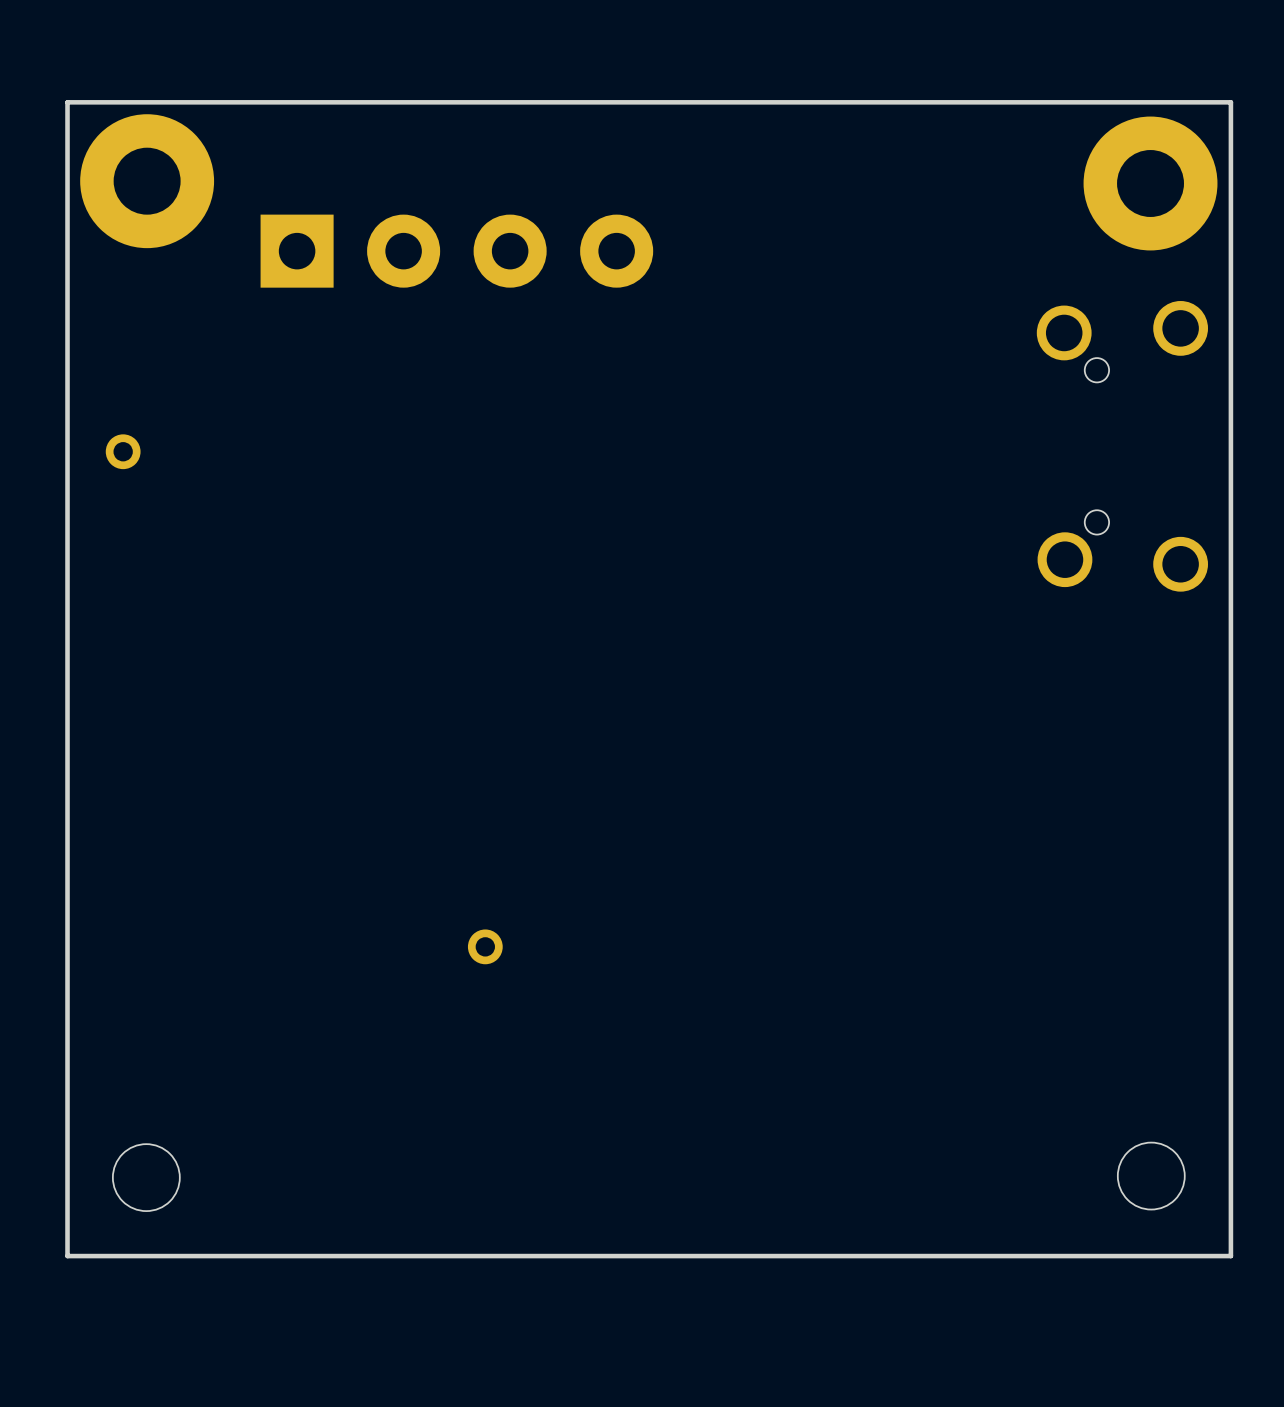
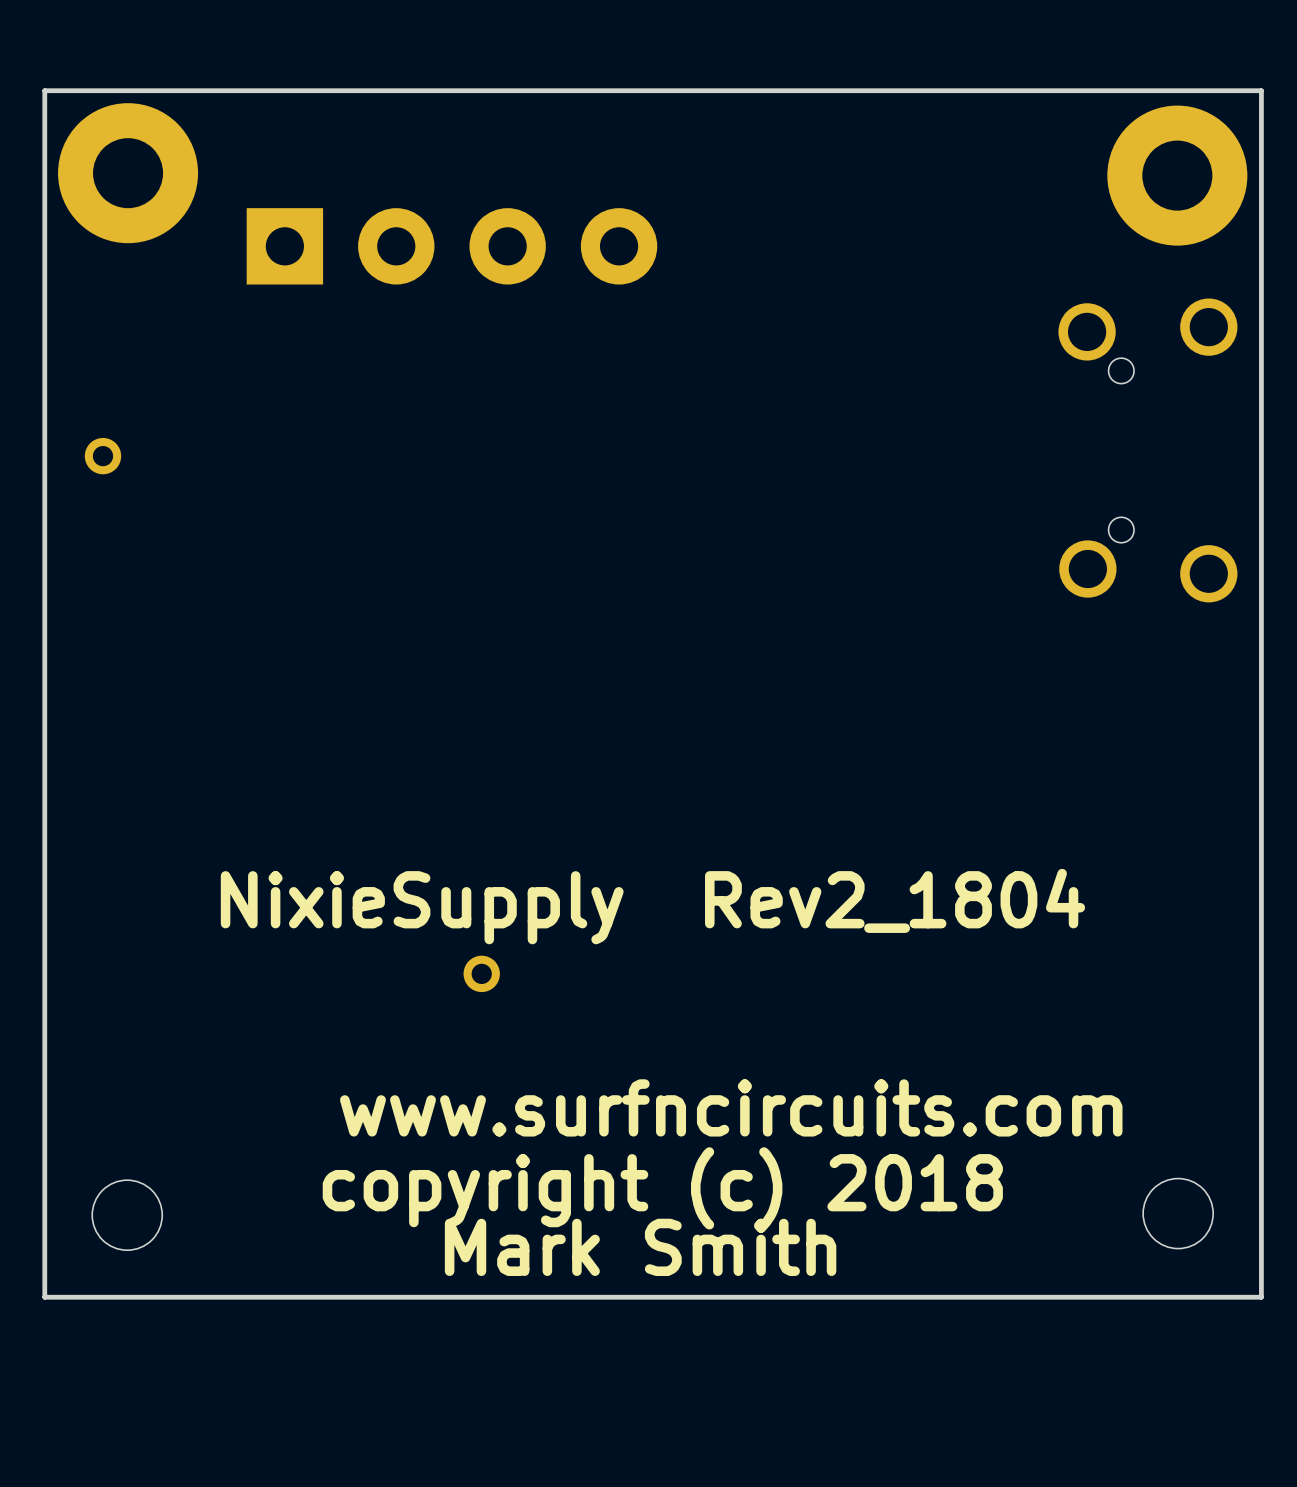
text: none -> NixieSupply Rev2_1804 (652, 906)
text: none -> www.surfncircuits.com (731, 1107)
text: none -> copyright (c) 2018 (662, 1188)
text: none -> Mark Smith (640, 1247)

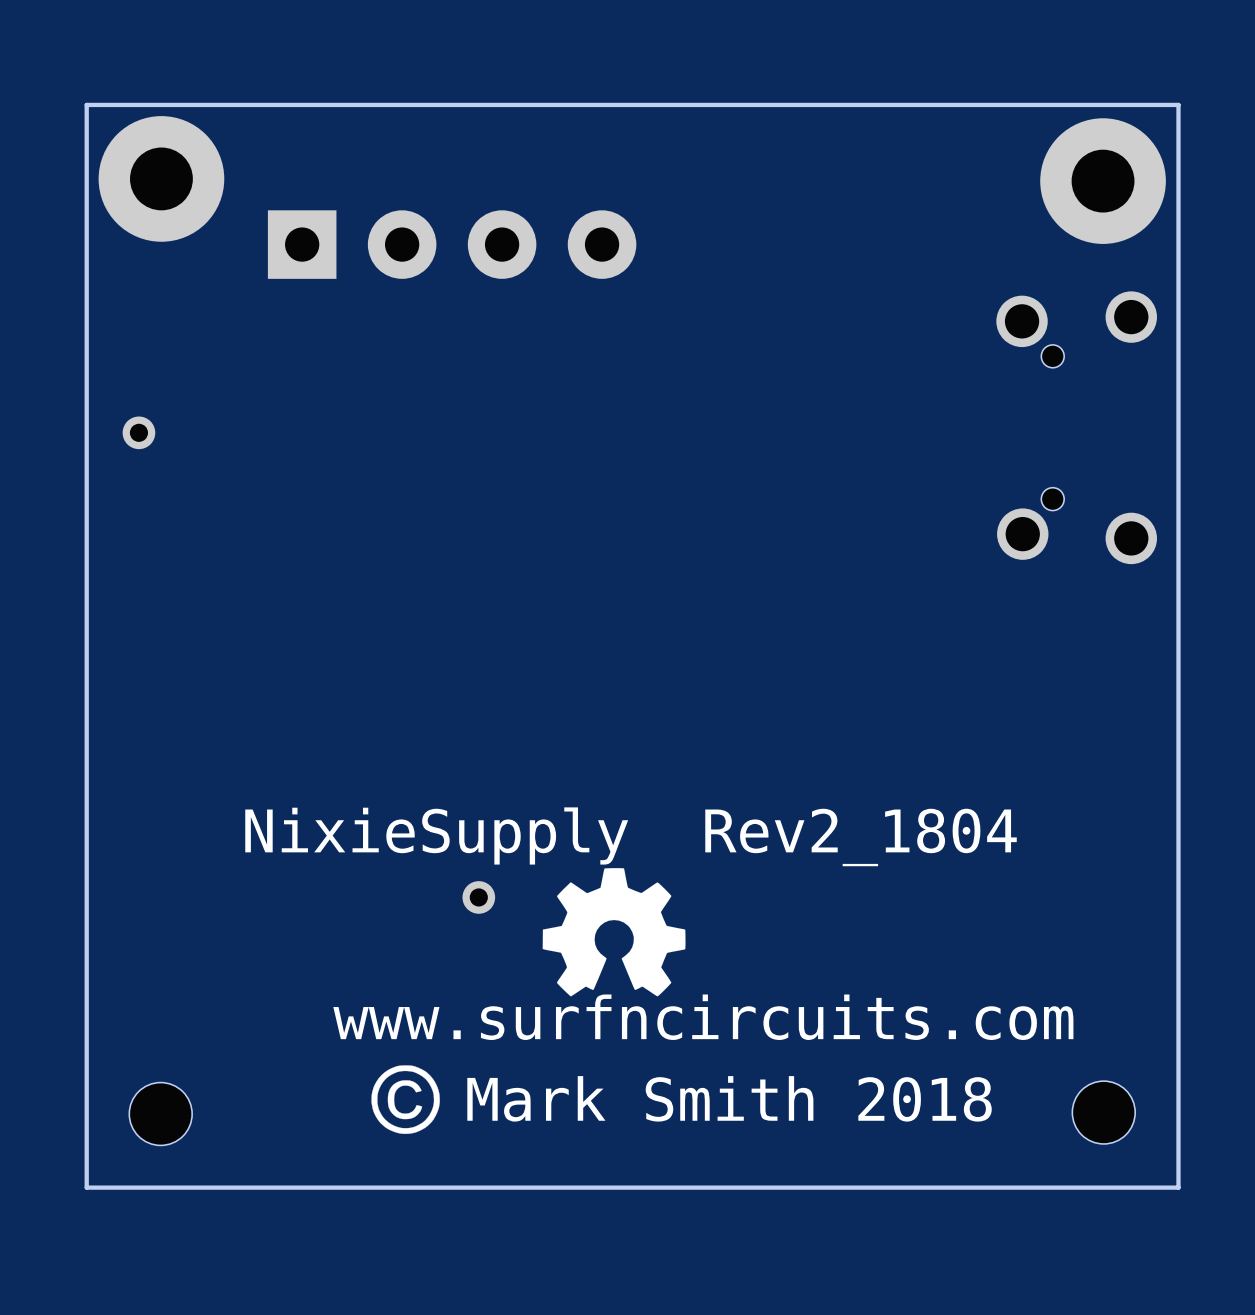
drawing: none -> [542, 868, 686, 997]
drawing: none -> [371, 1065, 440, 1134]
text: copyright (c) 2018 (662, 1188) -> none
text: Mark Smith (640, 1247) -> Mark Smith 2018 (729, 1098)

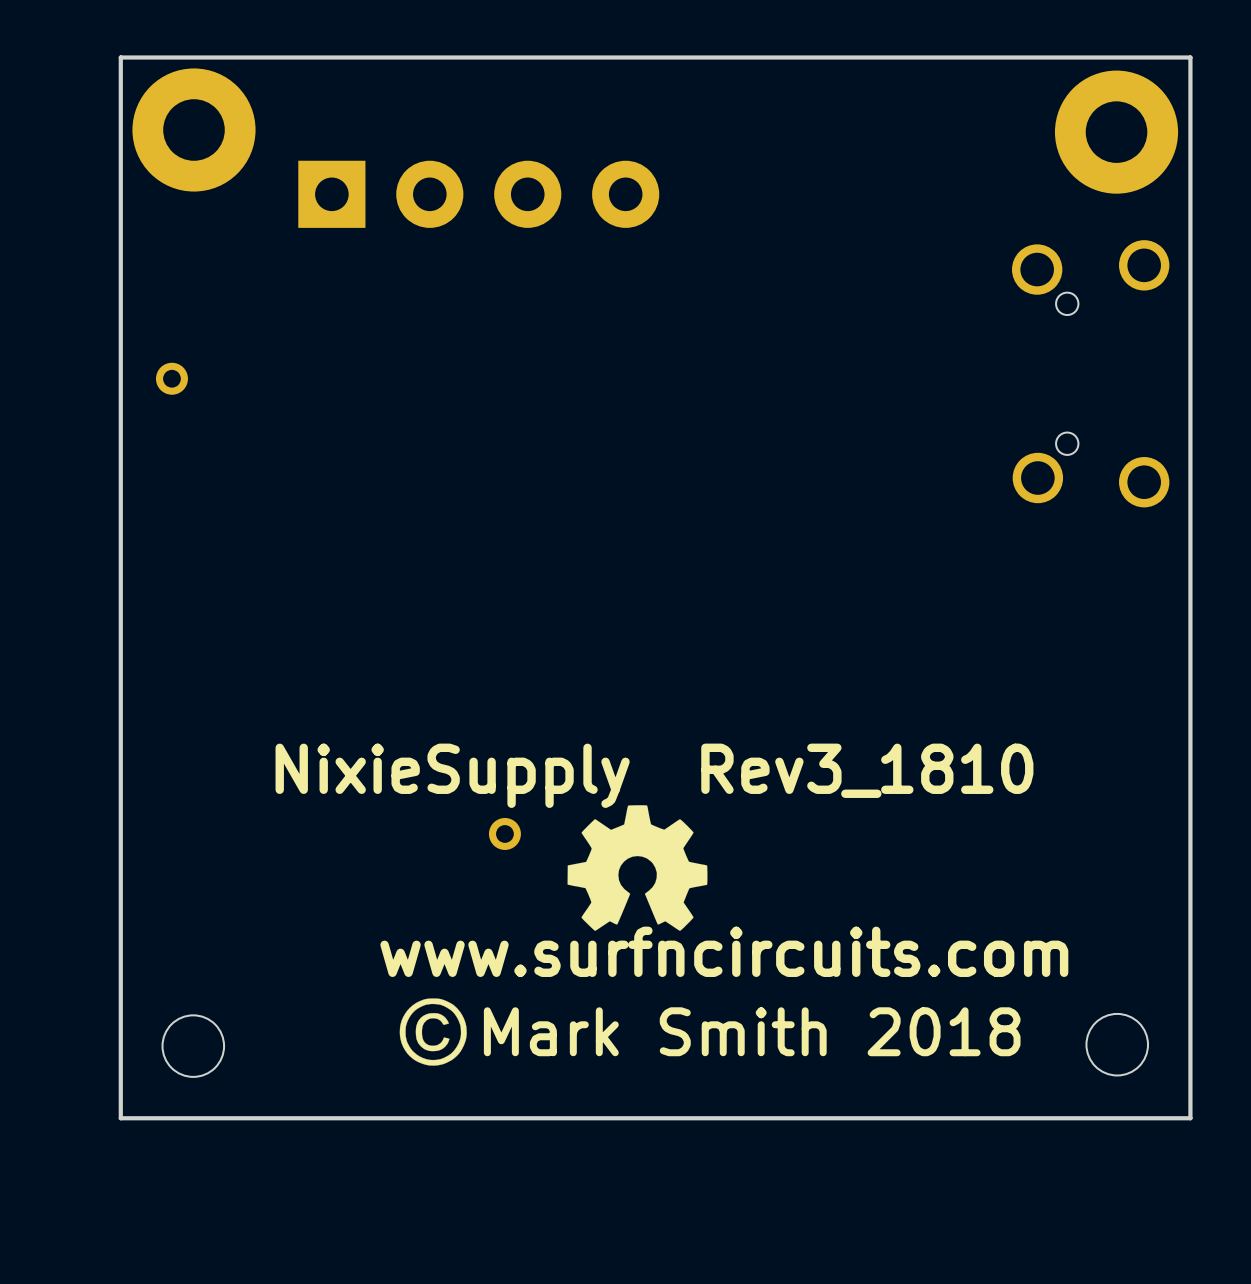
text: NixieSupply Rev2_1804 (631, 836) -> NixieSupply Rev3_1810 (654, 775)

